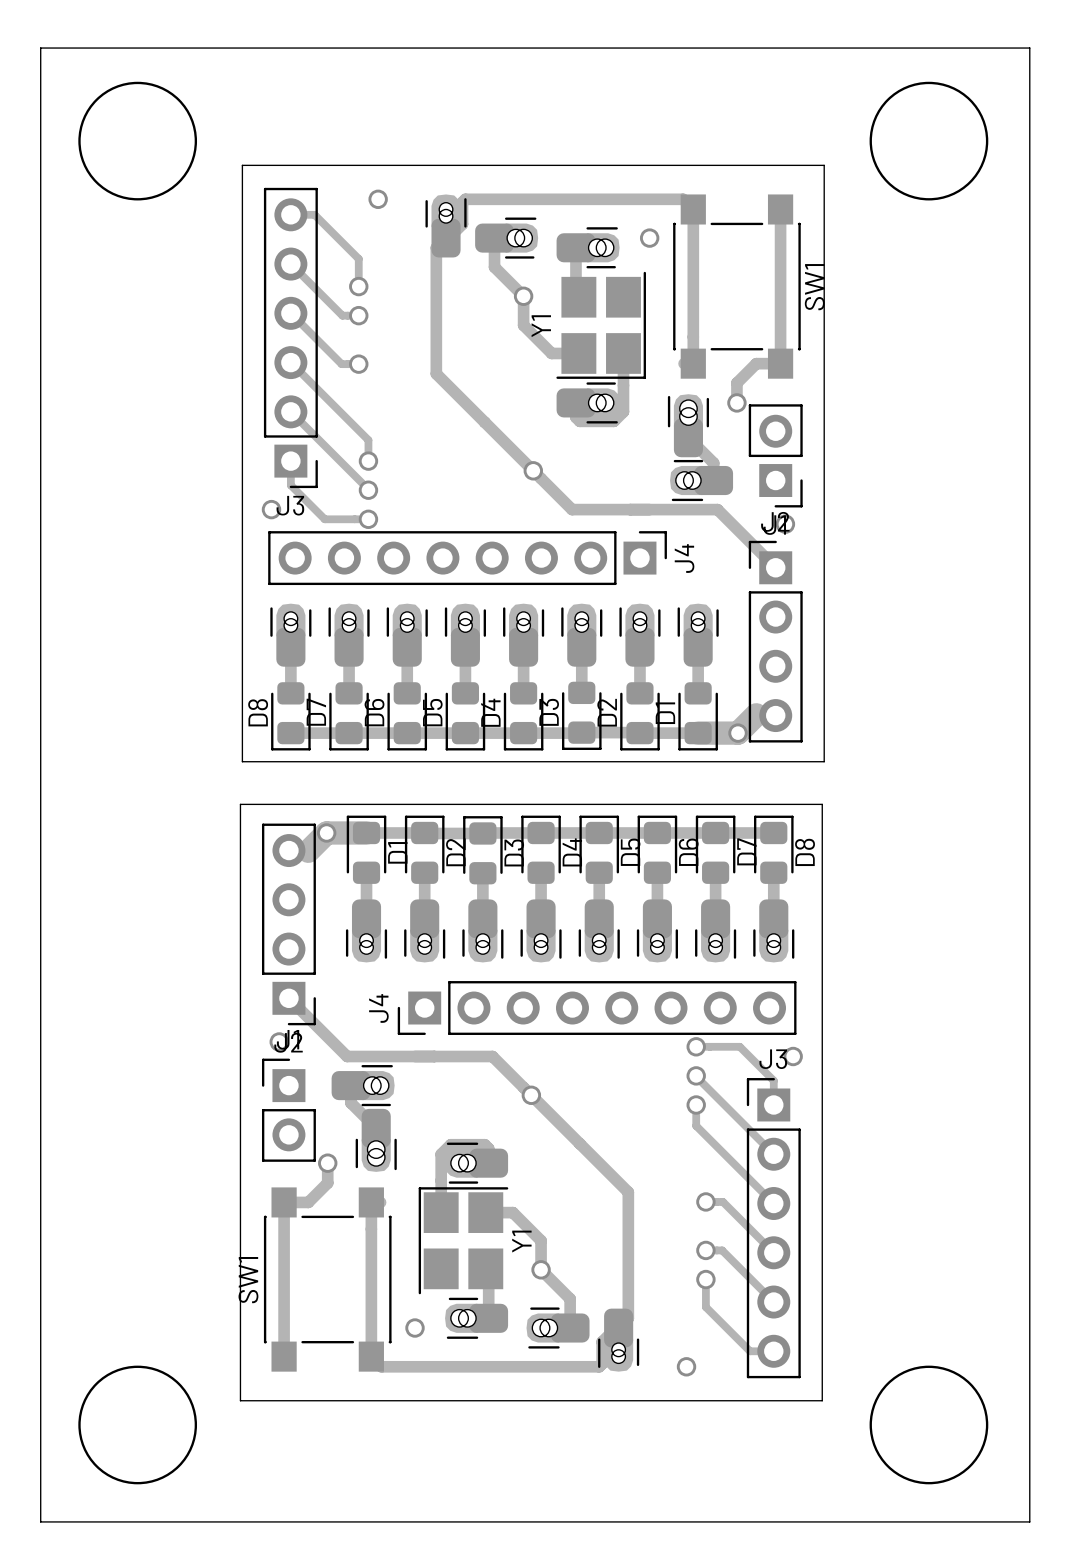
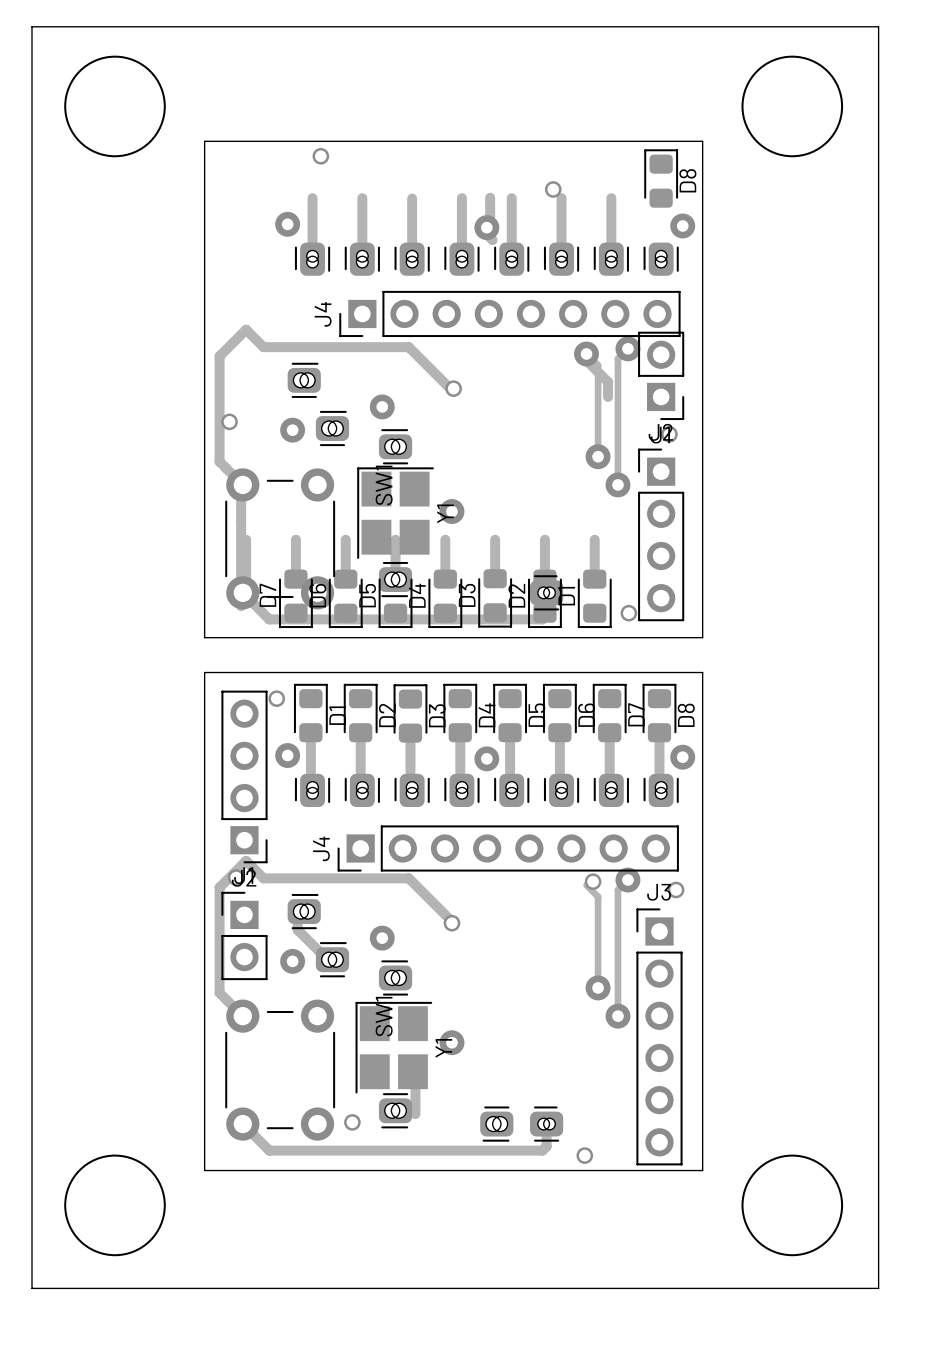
board edge: (242, 181) (242, 165) (824, 165) (824, 181) -> (204, 141) (702, 141)
track: (780, 209) (780, 363) (756, 363) (736, 383) (736, 402) -> none
track: (290, 214) (314, 214) (358, 258) (358, 286) -> none
part: (446, 225) -> none
D8: none -> (661, 178)
track: (494, 238) (494, 267) (523, 296) (523, 325) (551, 353) (578, 353) -> none
part: (506, 238) -> none
part: (588, 247) -> none
track: none -> (312, 198) (312, 259)
track: none -> (362, 198) (362, 259)
track: none -> (412, 198) (412, 259)
track: none -> (461, 198) (461, 259)
track: none -> (511, 198) (511, 259)
track: none -> (561, 198) (561, 259)
track: none -> (611, 198) (611, 259)
track: (290, 264) (342, 315) (358, 315) -> none
via: none -> (287, 224)
via: none -> (682, 225)
via: none -> (486, 227)
via: (358, 286) -> none
SW1: (736, 286) -> none
via: (523, 296) -> none
track: (290, 313) (341, 364) (358, 364) -> none
via: (358, 315) -> none
part: none -> (312, 259)
part: none -> (362, 259)
part: none -> (412, 259)
part: none -> (461, 259)
part: none -> (511, 259)
part: none -> (561, 259)
part: none -> (611, 259)
part: none -> (661, 259)
Y1 rotation: 0° (601, 325) -> 180° (395, 513)
Y1 position: (601, 325) -> (395, 513)
J3: (290, 337) -> none
track: (623, 353) (623, 411) (613, 421) (579, 421) (575, 417) (575, 402) -> none
track: (290, 362) (368, 440) (368, 461) -> none
track: (684, 363) (693, 363) (693, 209) (683, 199) (465, 199) (462, 202) (462, 224) (436, 247) (436, 373) (572, 509) (717, 509) (775, 567) -> none
via: (358, 364) -> none
part: (588, 402) -> none
via: (736, 402) -> none
track: (290, 411) (368, 490) -> none
track: none -> (627, 348) (617, 358) (617, 484)
via: none -> (627, 348)
part: (688, 425) -> none
track: none -> (586, 353) (598, 365) (598, 456)
via: none -> (586, 353)
track: (290, 461) (290, 485) (324, 519) (368, 519) -> none
part: none -> (304, 380)
via: (368, 461) -> none
track: none -> (450, 388) (408, 347) (263, 347) (246, 329) (219, 356) (219, 461) (242, 484)
part: (701, 480) -> none
via: (368, 490) -> none
via: none -> (382, 406)
part: none -> (332, 428)
via: none -> (292, 430)
via: (368, 519) -> none
part: none -> (395, 446)
via: none -> (598, 456)
J4 rotation: 0° (467, 558) -> 180° (509, 313)
via: none -> (617, 484)
track: none -> (241, 498) (241, 606)
via: none -> (451, 511)
part: (290, 635) -> none
part: (349, 635) -> none
part: (407, 635) -> none
part: (465, 635) -> none
part: (523, 635) -> none
part: (581, 635) -> none
part: (639, 635) -> none
part: (698, 635) -> none
SW1: none -> (280, 538)
part: none -> (395, 579)
track: none -> (242, 592) (269, 619) (542, 619) (546, 615) (546, 592)
part: none -> (546, 592)
track: (756, 714) (738, 733) (290, 733) -> none
D8: (290, 716) -> none
board edge: (240, 804) (240, 1400) (822, 1400) (822, 804) (240, 804) -> (204, 672) (204, 1170) (702, 1170) (702, 672) (204, 672)
track: (773, 832) (326, 832) (308, 851) -> none
via: none -> (287, 755)
part footprint: [345, 899, 388, 963] -> [294, 773, 331, 807]
part footprint: [404, 899, 446, 963] -> [344, 773, 380, 807]
part footprint: [462, 899, 504, 963] -> [394, 773, 430, 807]
part footprint: [520, 899, 562, 963] -> [444, 773, 480, 807]
part footprint: [578, 899, 620, 963] -> [494, 773, 530, 807]
part footprint: [636, 899, 678, 963] -> [543, 773, 580, 807]
part footprint: [695, 899, 737, 963] -> [593, 773, 629, 807]
part footprint: [753, 899, 795, 963] -> [643, 773, 679, 807]
via: none -> (682, 757)
via: none -> (486, 758)
track: (288, 998) (347, 1056) (492, 1056) (628, 1192) (628, 1318) (602, 1341) (602, 1363) (599, 1366) (381, 1366) (371, 1356) (371, 1202) (380, 1202) -> none
track: none -> (627, 880) (617, 889) (617, 1016)
via: none -> (627, 880)
track: (696, 1046) (739, 1046) (773, 1080) (773, 1104) -> none
track: none -> (586, 885) (598, 896) (598, 987)
part footprint: [331, 1065, 395, 1107] -> [287, 893, 321, 930]
track: (696, 1075) (773, 1154) -> none
via: (696, 1075) -> none
track: none -> (450, 919) (408, 878) (263, 878) (246, 860) (219, 887) (219, 992) (242, 1016)
track: (696, 1104) (696, 1125) (773, 1203) -> none
via: (696, 1104) -> none
part footprint: [355, 1108, 397, 1172] -> [315, 942, 350, 978]
via: none -> (382, 938)
via: none -> (292, 961)
part footprint: [445, 1142, 509, 1184] -> [378, 960, 413, 996]
track: (327, 1163) (327, 1183) (308, 1202) (284, 1202) (284, 1356) -> none
via: (327, 1163) -> none
track: (488, 1163) (488, 1148) (484, 1144) (450, 1144) (441, 1154) (441, 1212) -> none
via: none -> (598, 987)
SW1 footprint: [263, 1187, 392, 1372] -> [225, 999, 336, 1141]
track: (705, 1201) (722, 1201) (773, 1252) -> none
via: (705, 1201) -> none
via: none -> (617, 1016)
track: (485, 1212) (512, 1212) (541, 1240) (541, 1269) (570, 1298) (570, 1328) -> none
via: none -> (451, 1042)
track: (705, 1250) (722, 1250) (773, 1302) -> none
via: (705, 1250) -> none
via: (541, 1269) -> none
track: (705, 1279) (705, 1307) (750, 1351) (773, 1351) -> none
via: (705, 1279) -> none
SW1 name position: SW1 (248, 1280) -> SW1 (384, 1016)
part footprint: [445, 1297, 509, 1339] -> [378, 1093, 413, 1129]
part: (558, 1328) -> none
track: none -> (242, 1124) (269, 1150) (542, 1150) (546, 1146) (546, 1124)
part: none -> (496, 1124)
part: none -> (546, 1124)
part: (618, 1340) -> none

